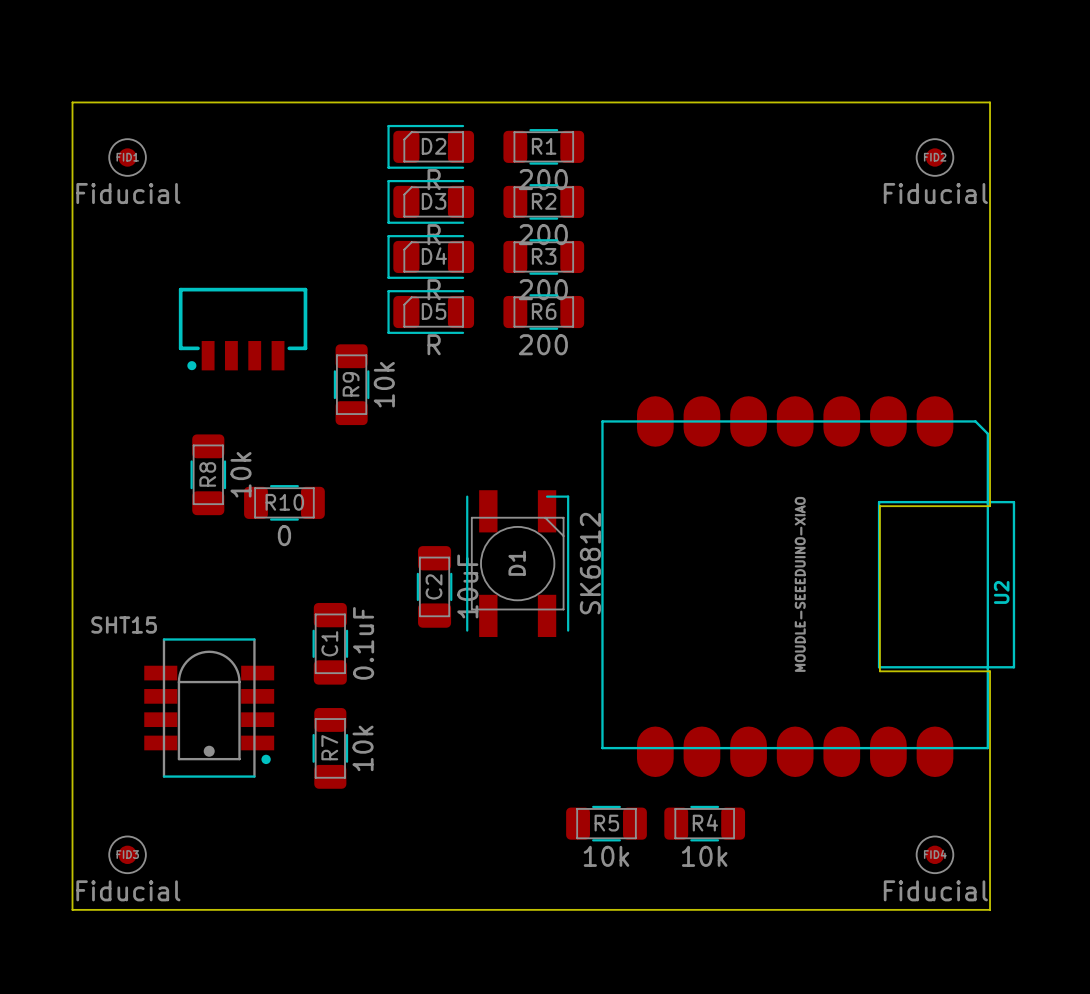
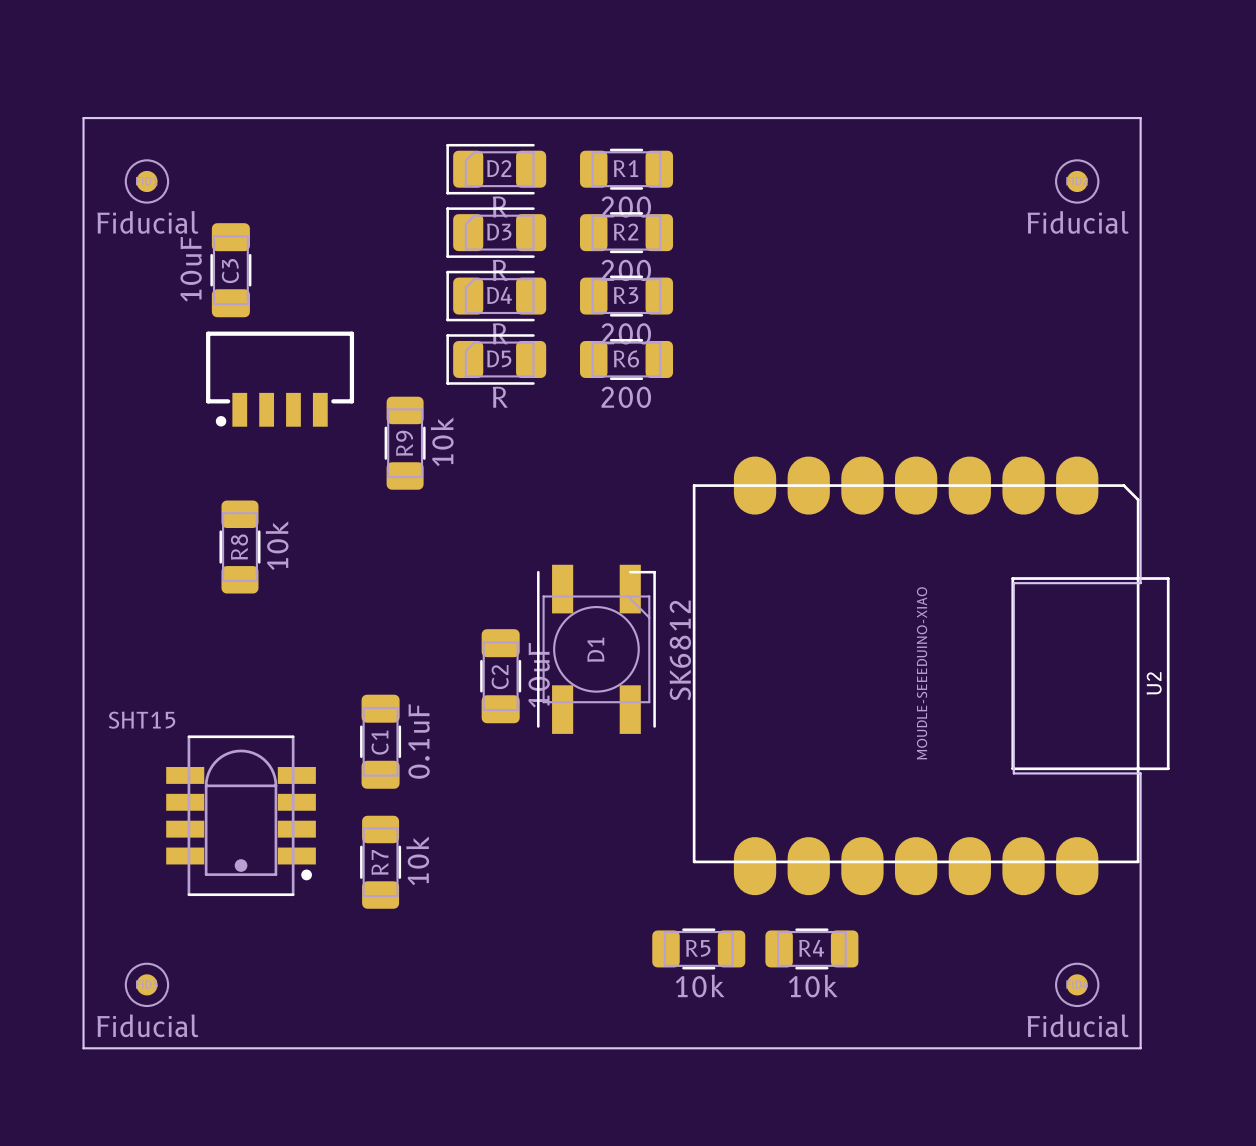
C3: none -> 10uF (230, 270)
R10: 0 (284, 502) -> none

